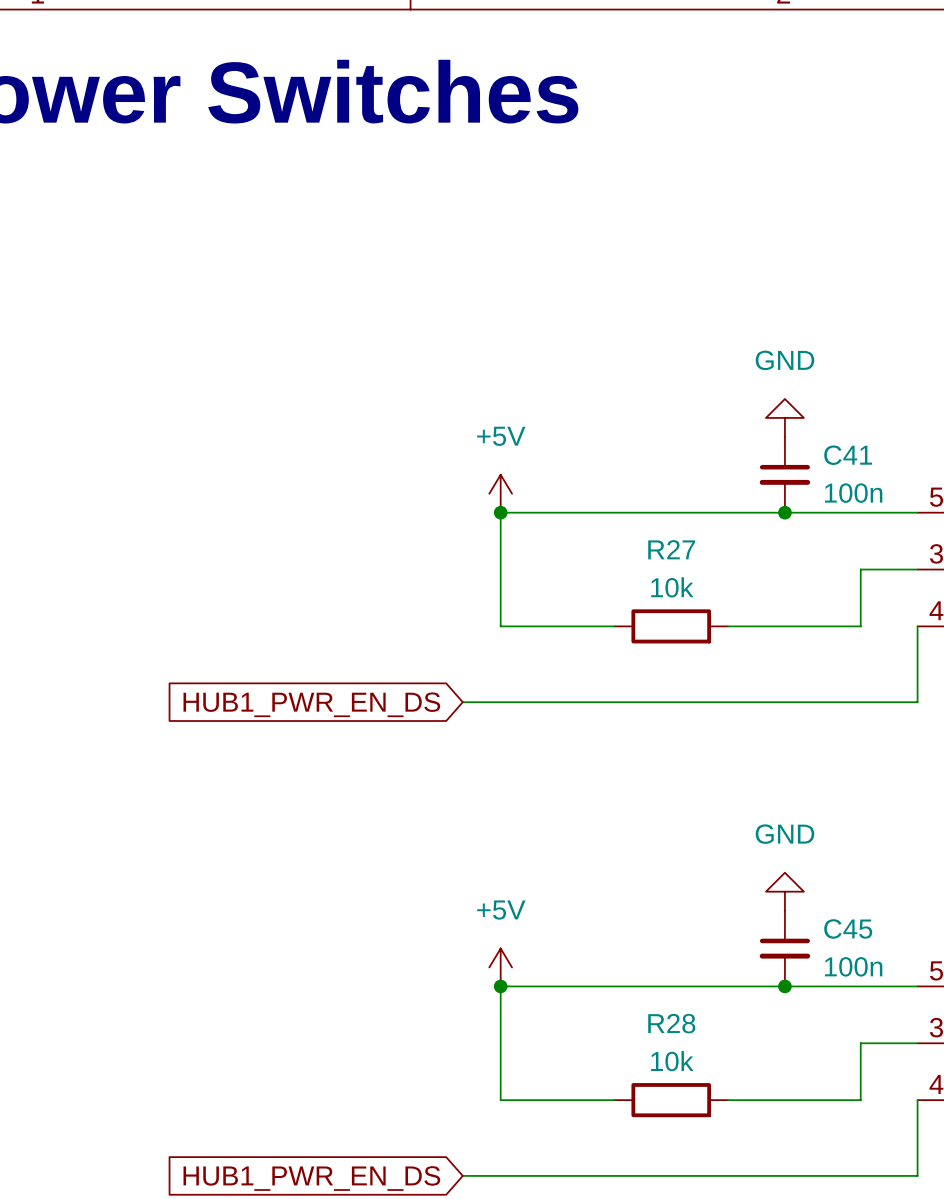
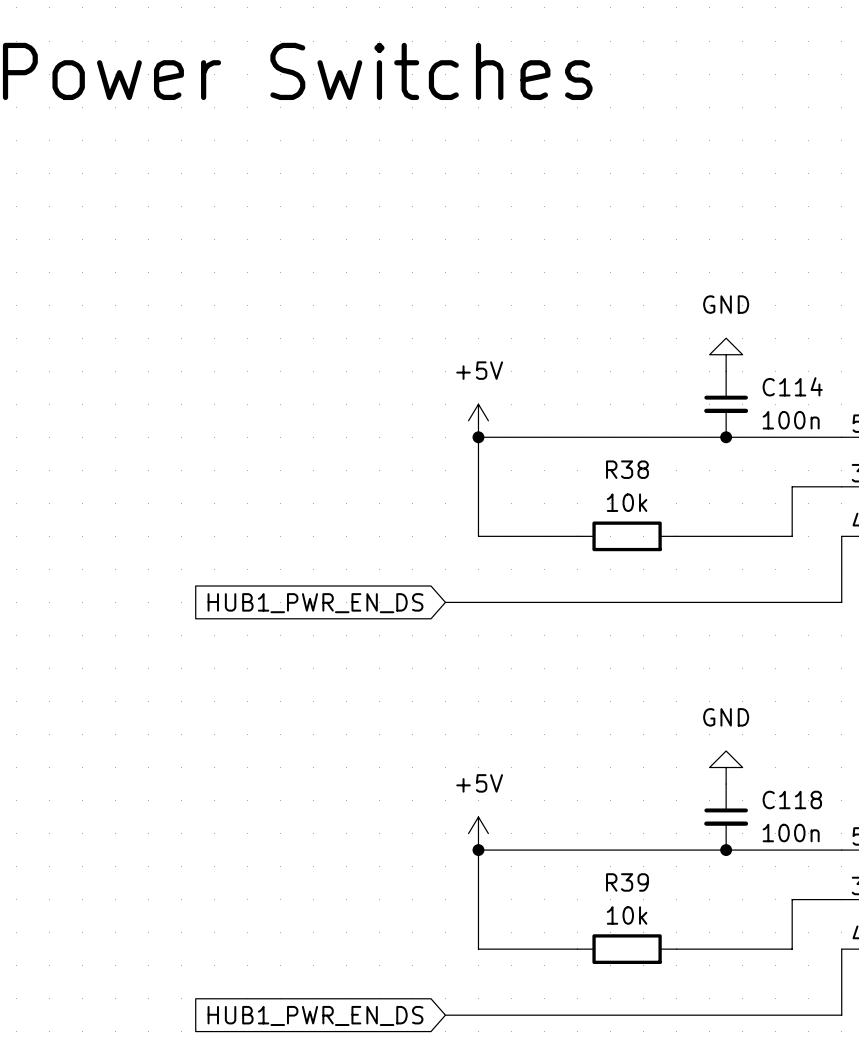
C41 name: C41 (848, 455) -> C114 (792, 386)
R27 name: R27 (671, 549) -> R38 (627, 469)
C45 name: C45 (848, 928) -> C118 (792, 799)
R28 name: R28 (671, 1023) -> R39 (627, 882)

